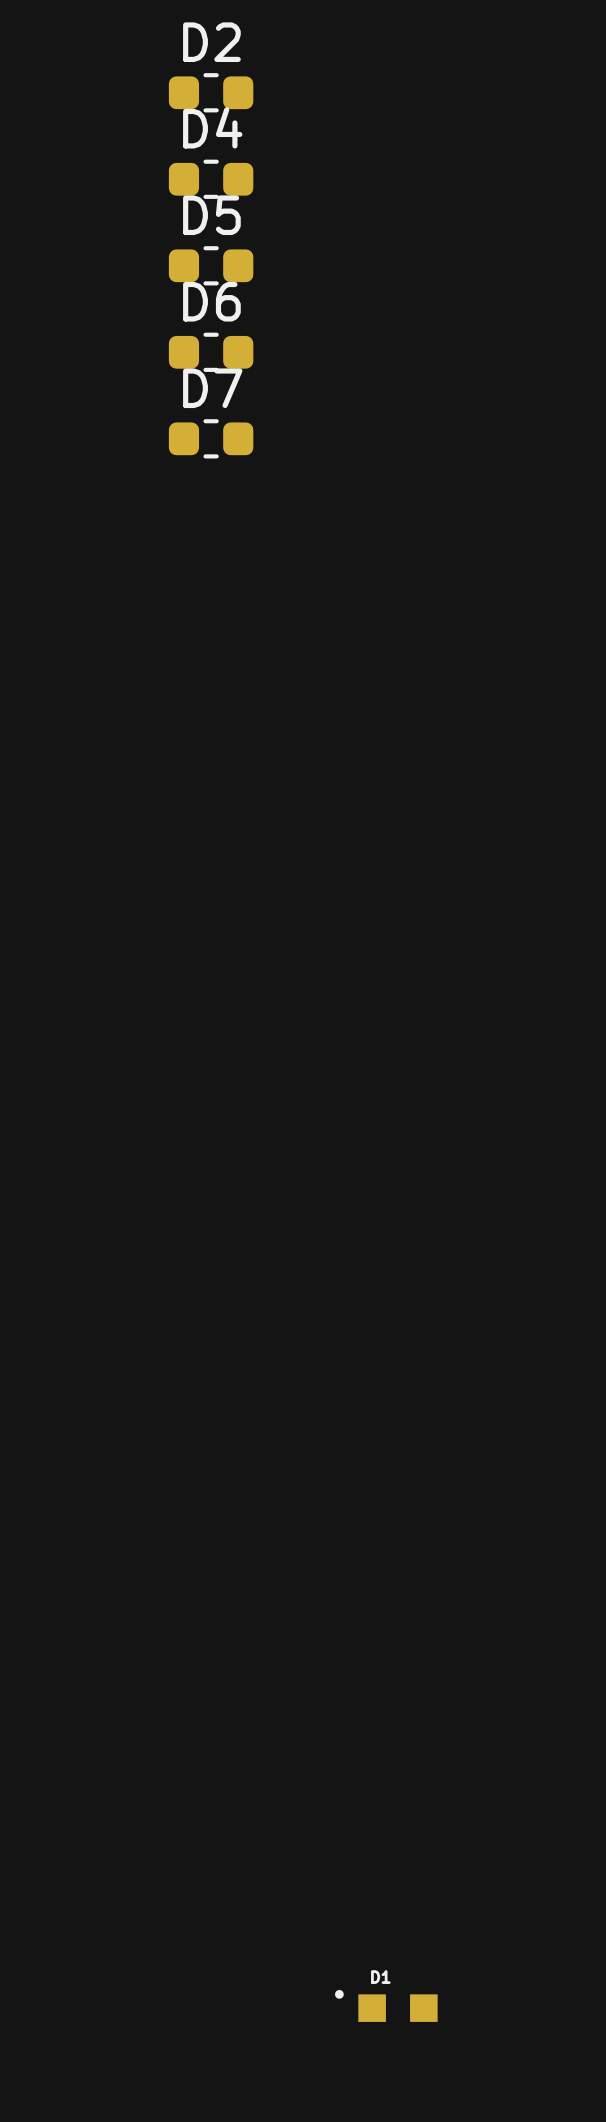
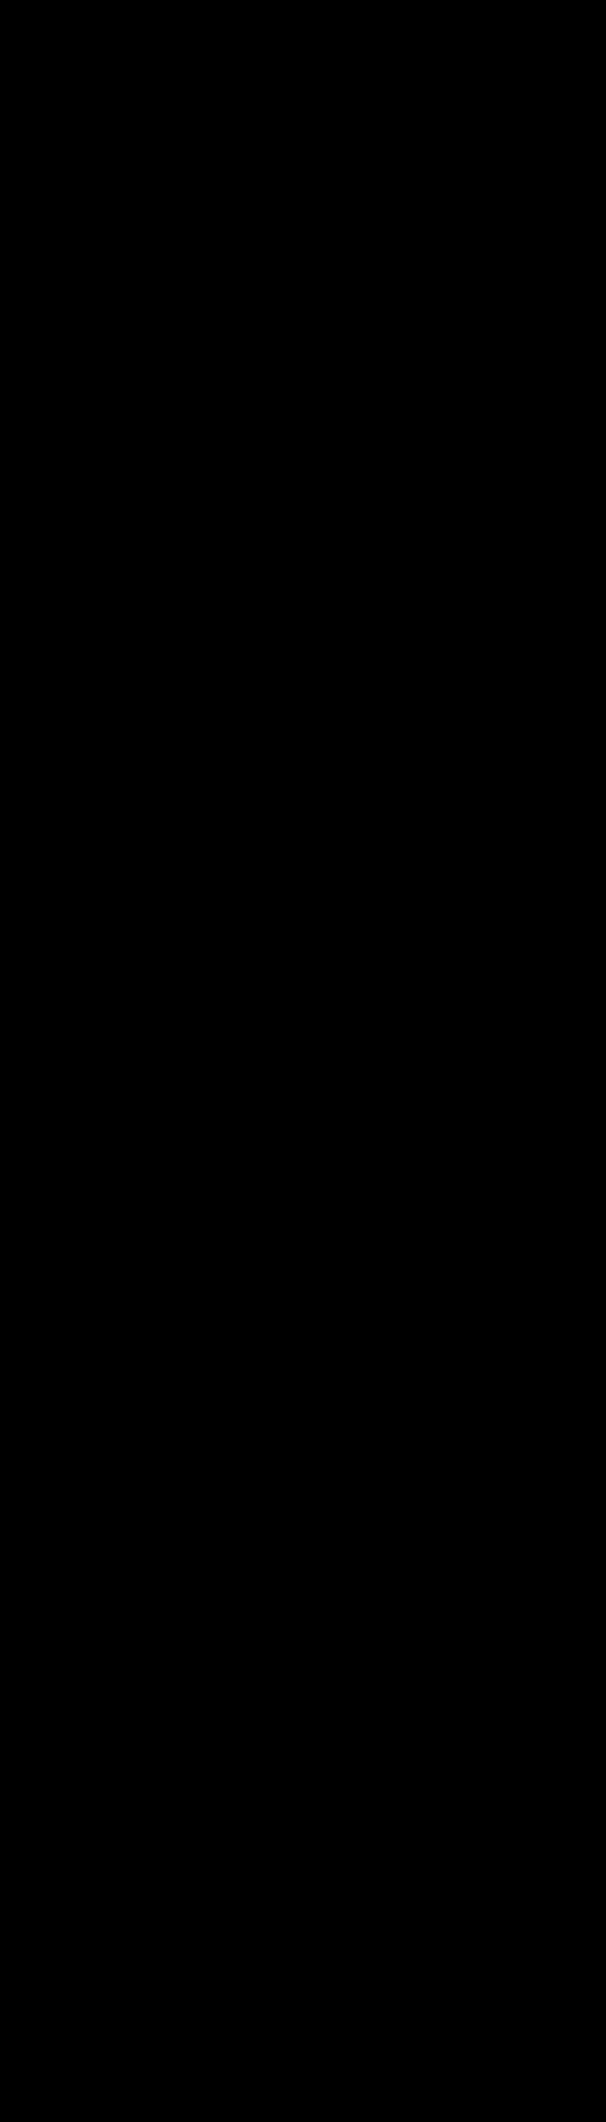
D2: (211, 92) -> none
D4: (211, 179) -> none
D5: (211, 265) -> none
D6: (211, 352) -> none
D7: (211, 438) -> none
D1: (386, 2005) -> none

